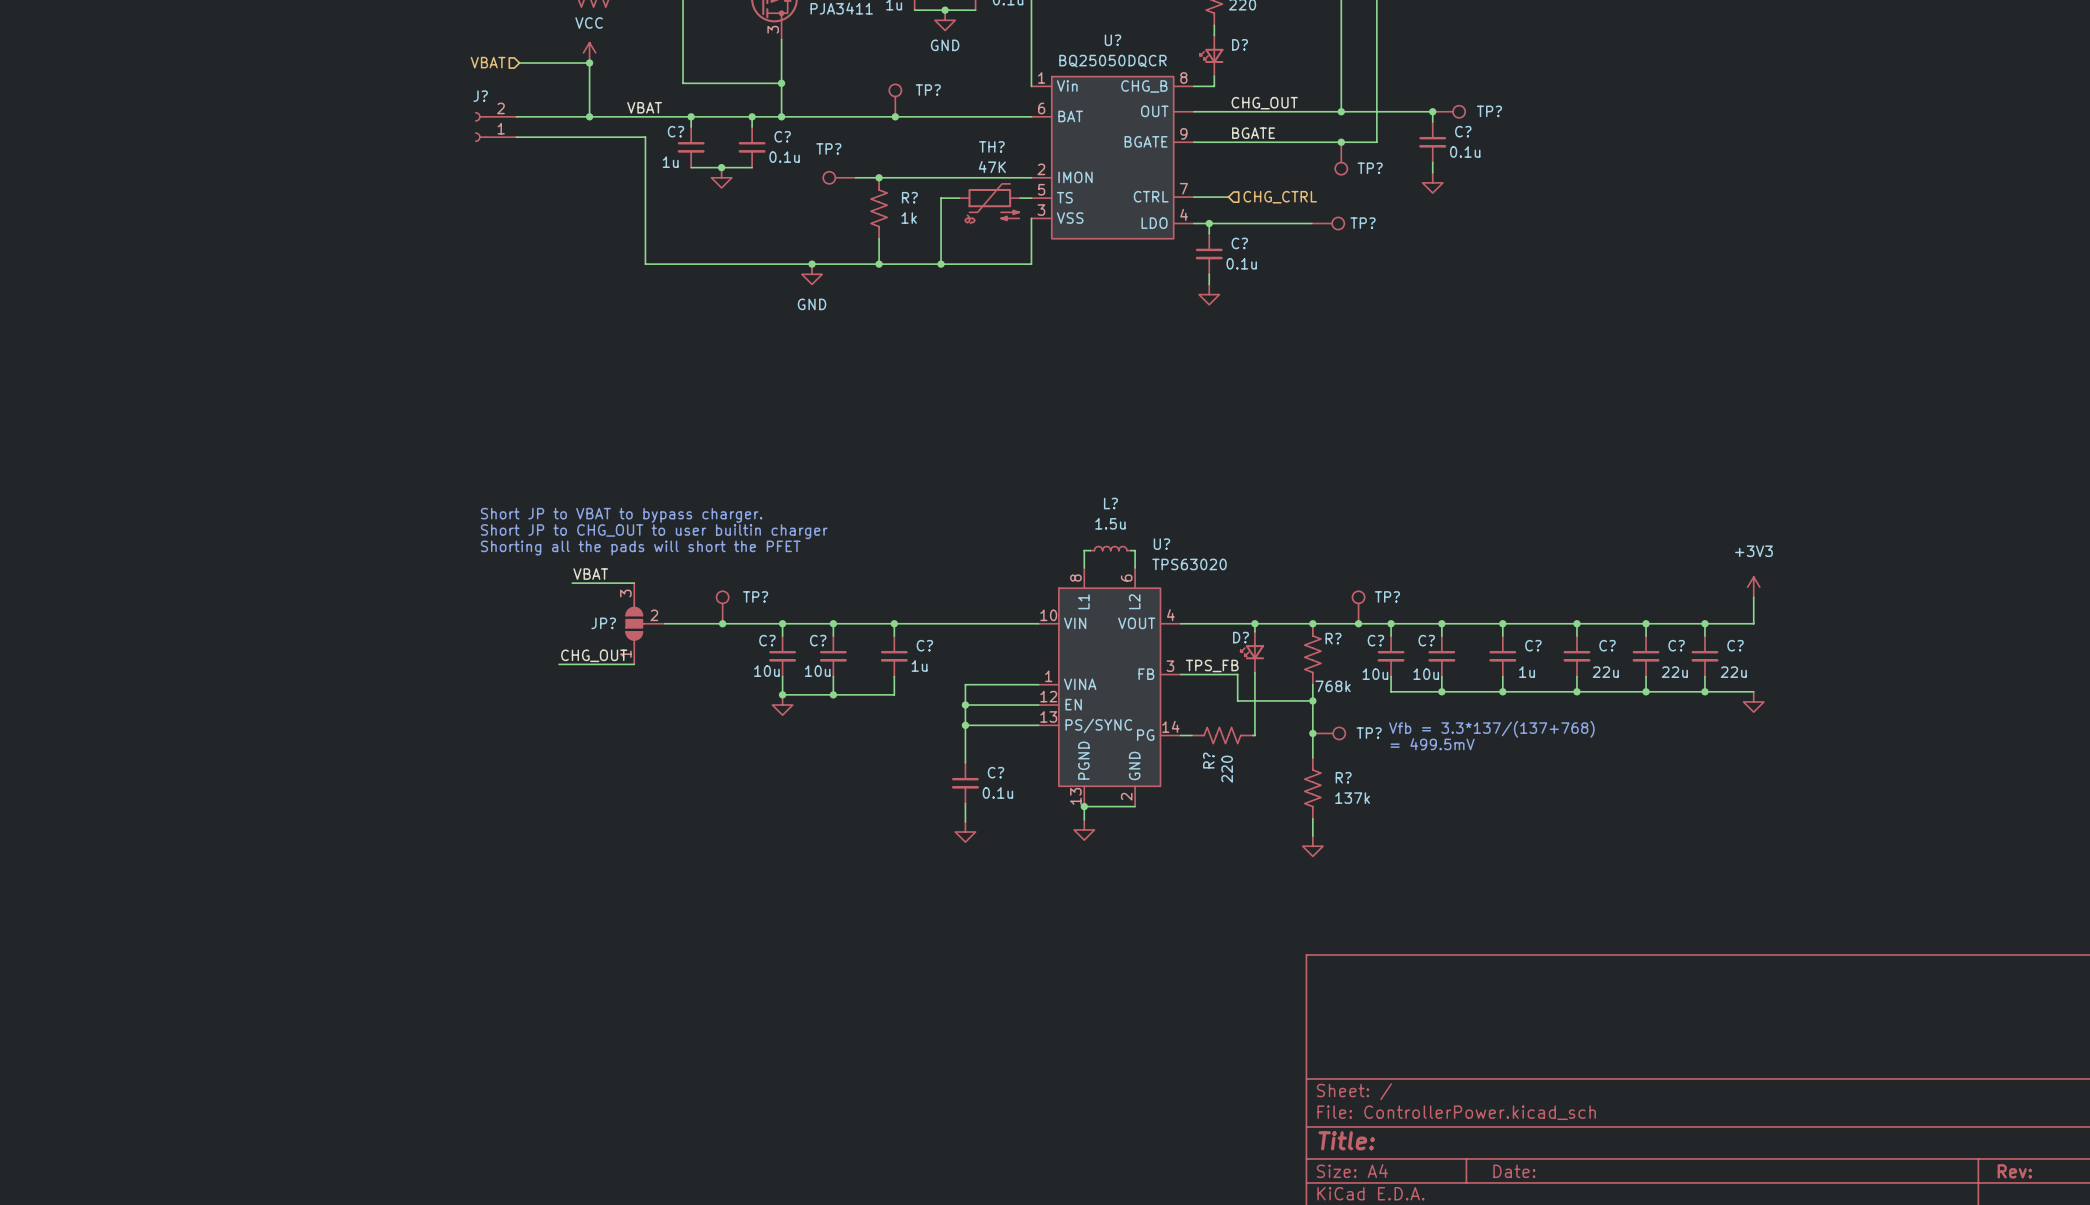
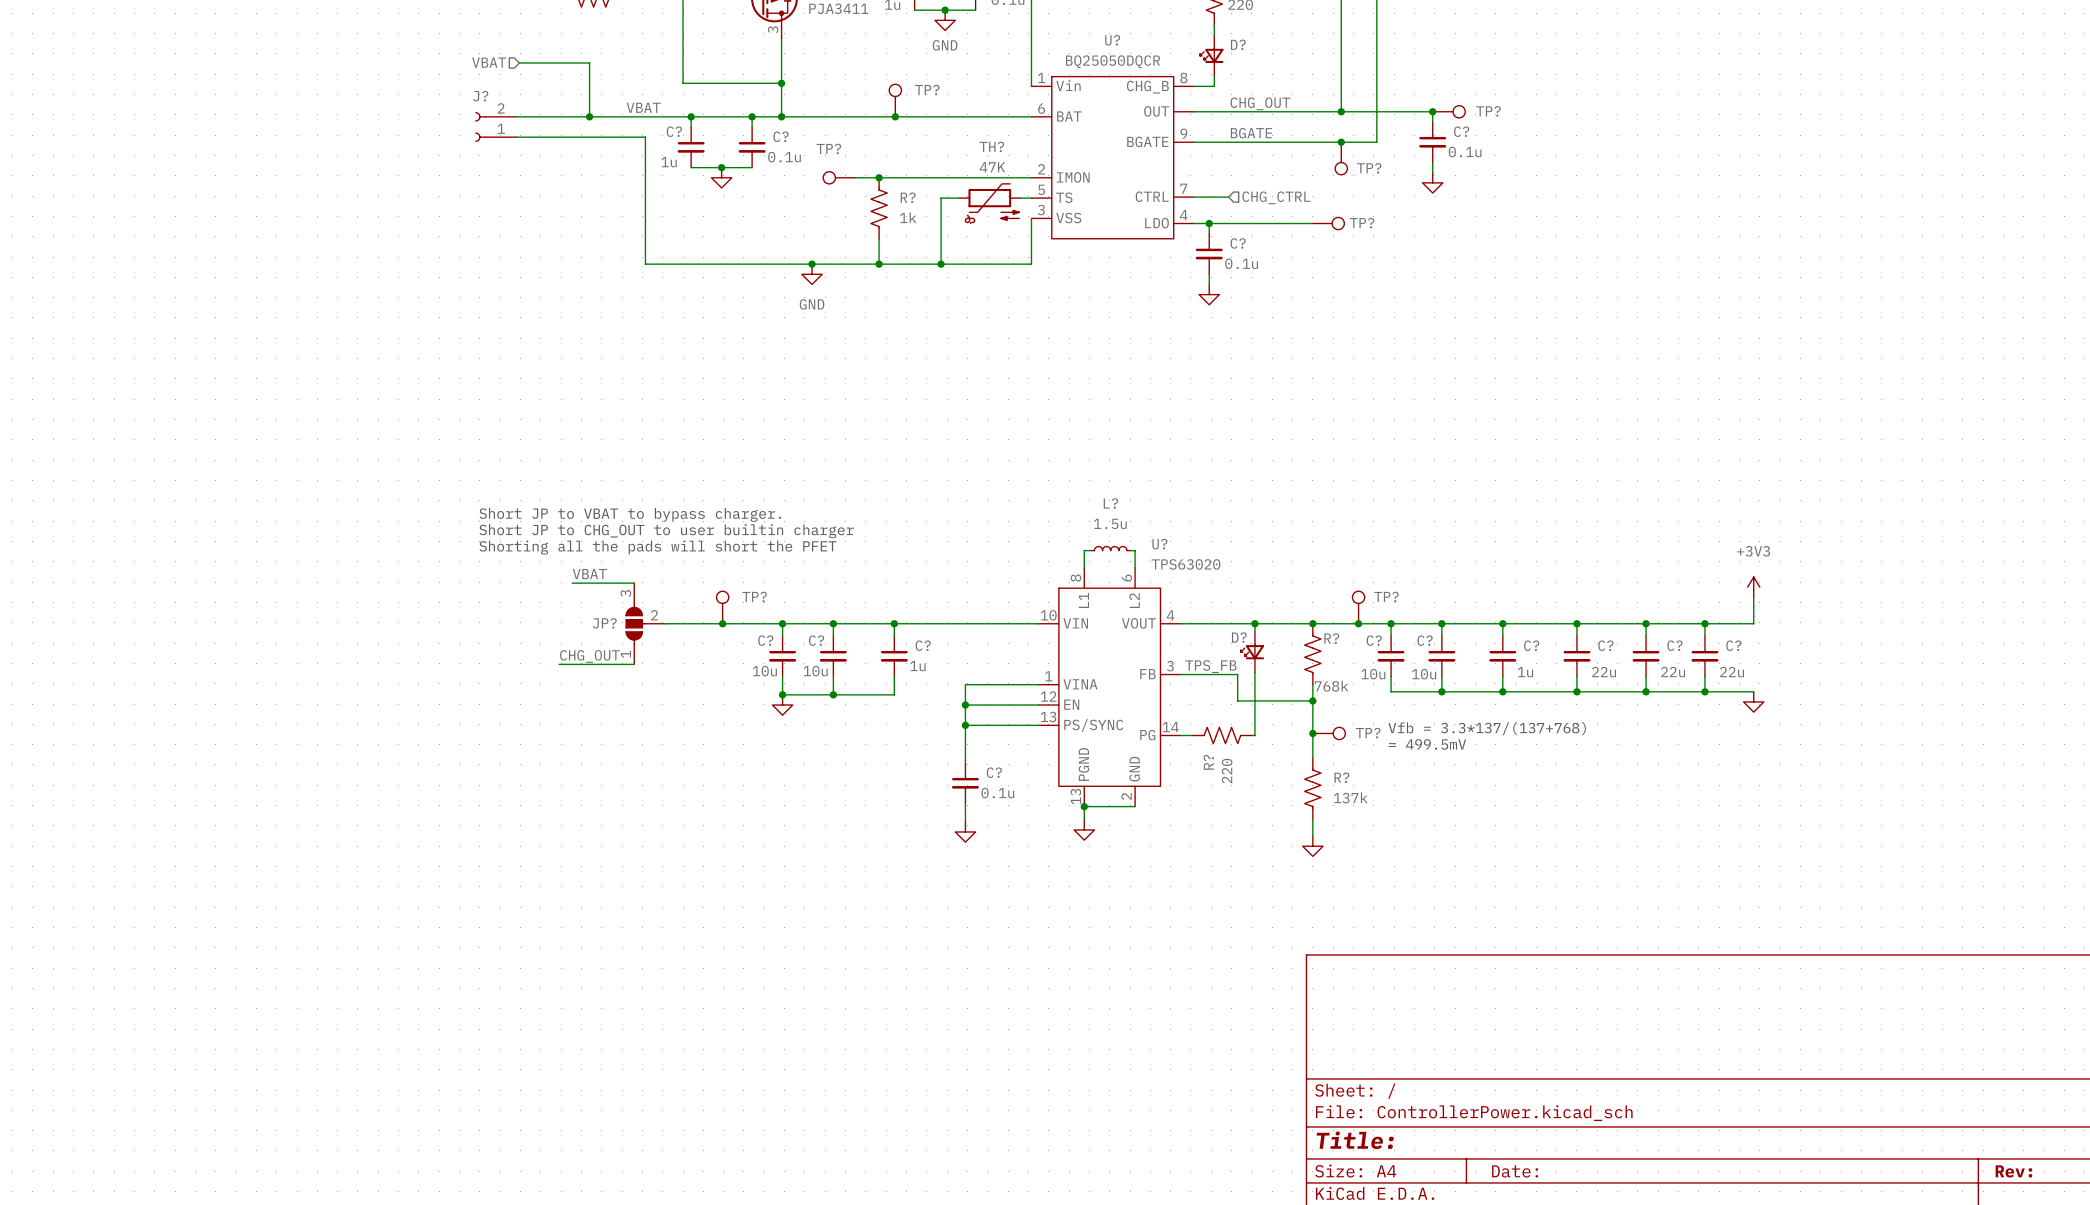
power symbol: VCC (589, 52) -> none
junction: (589, 63) -> none

